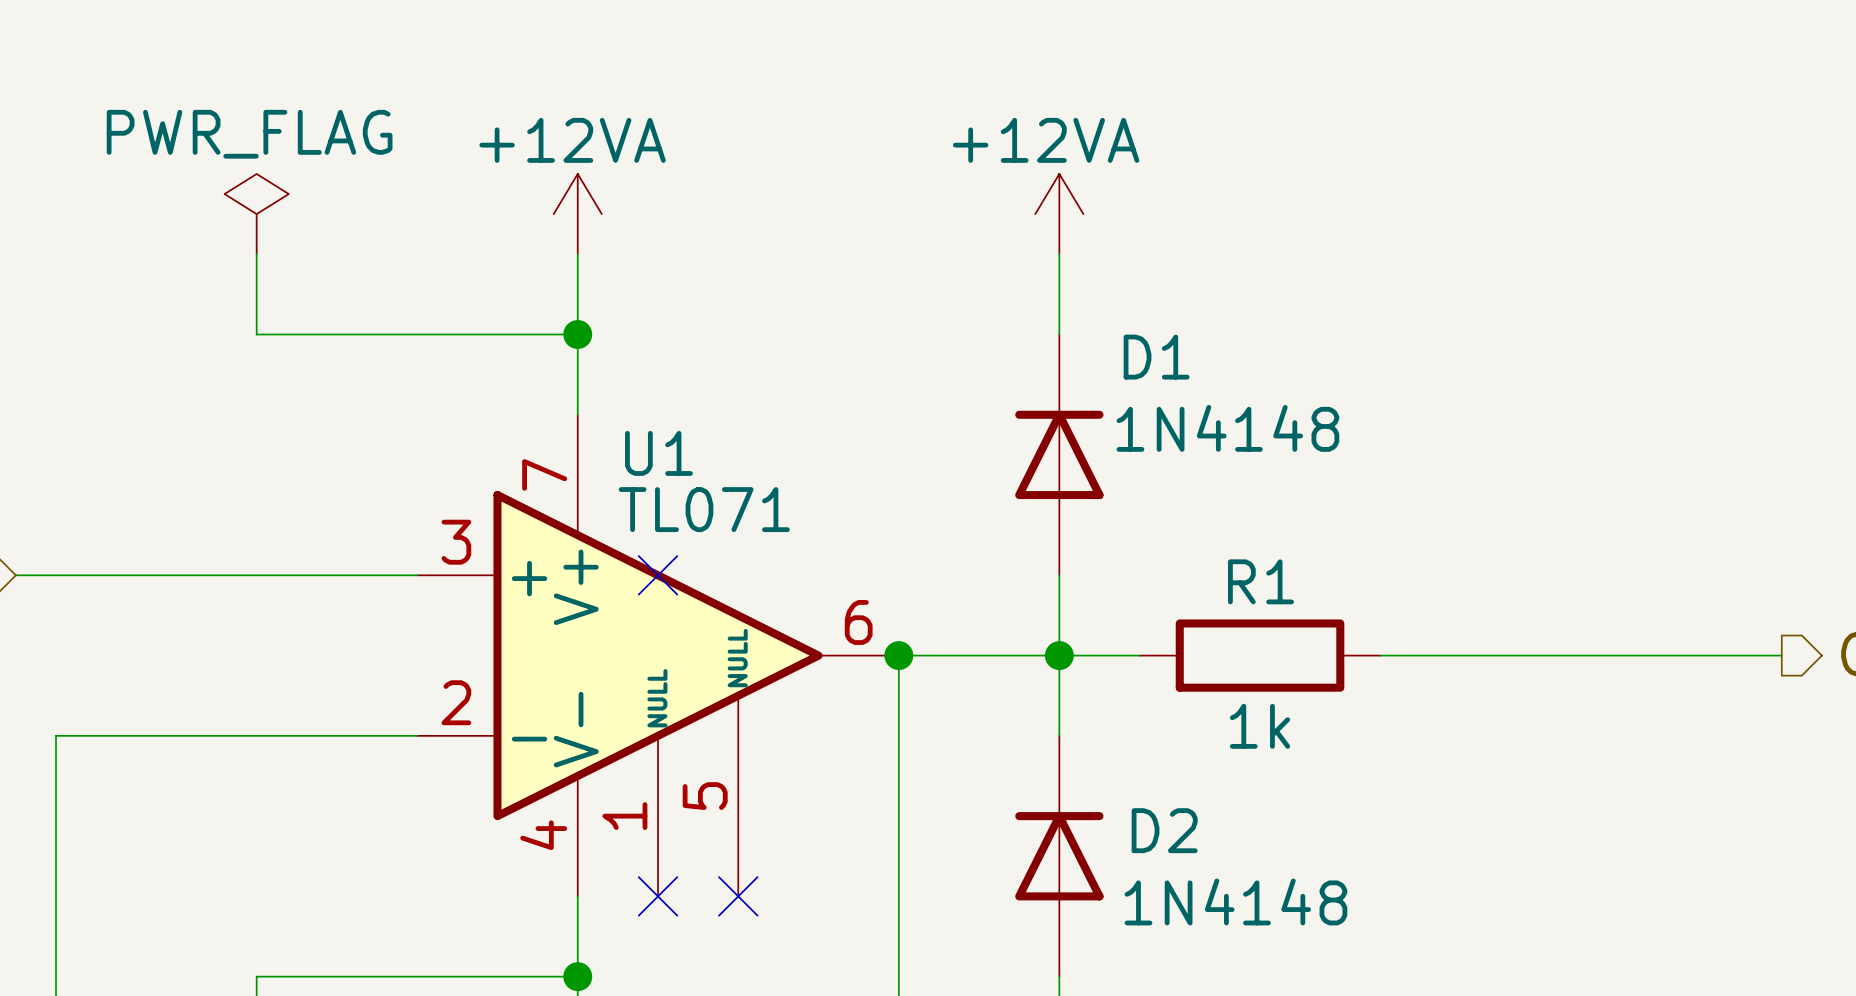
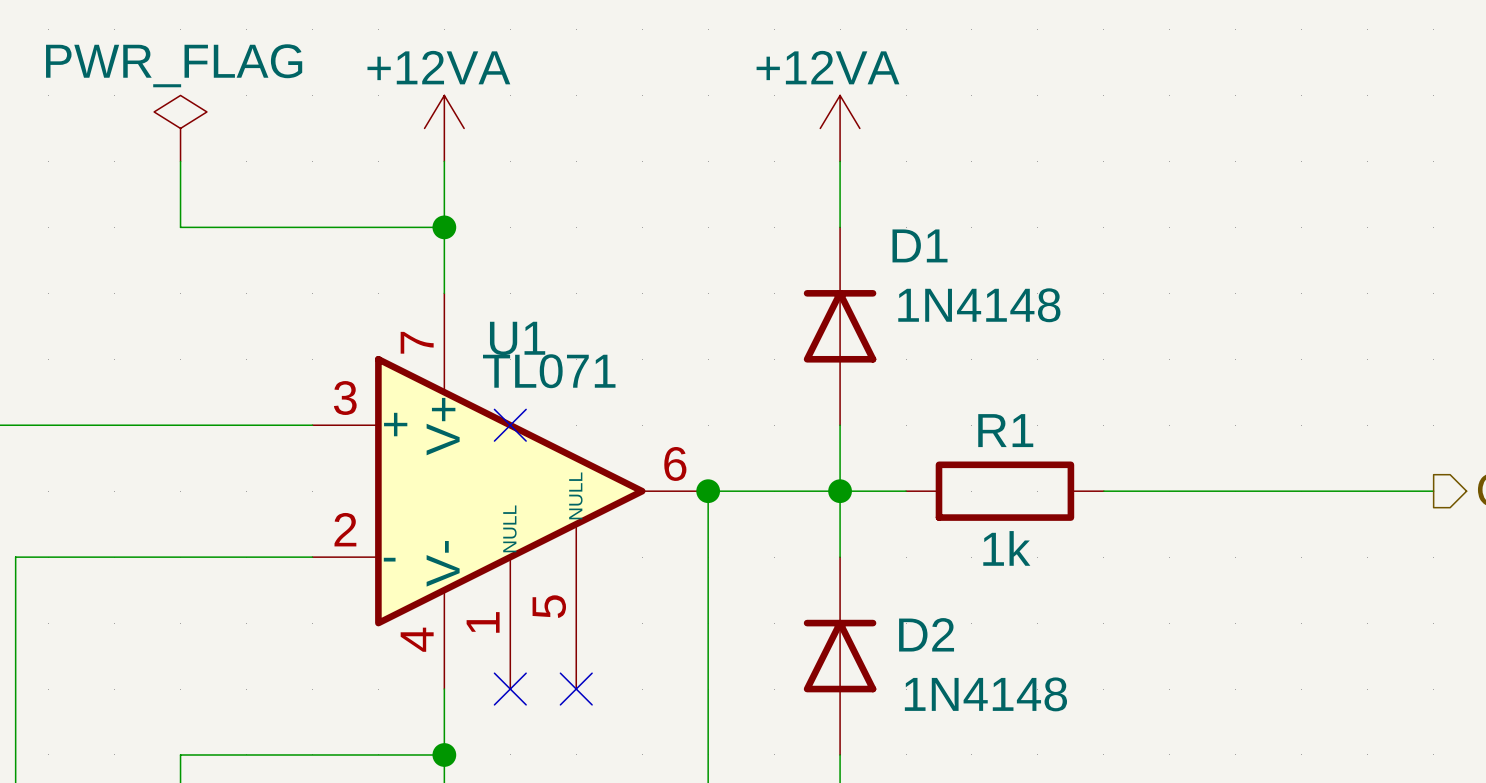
U1 name position: U1 (658, 453) -> U1 (517, 338)

